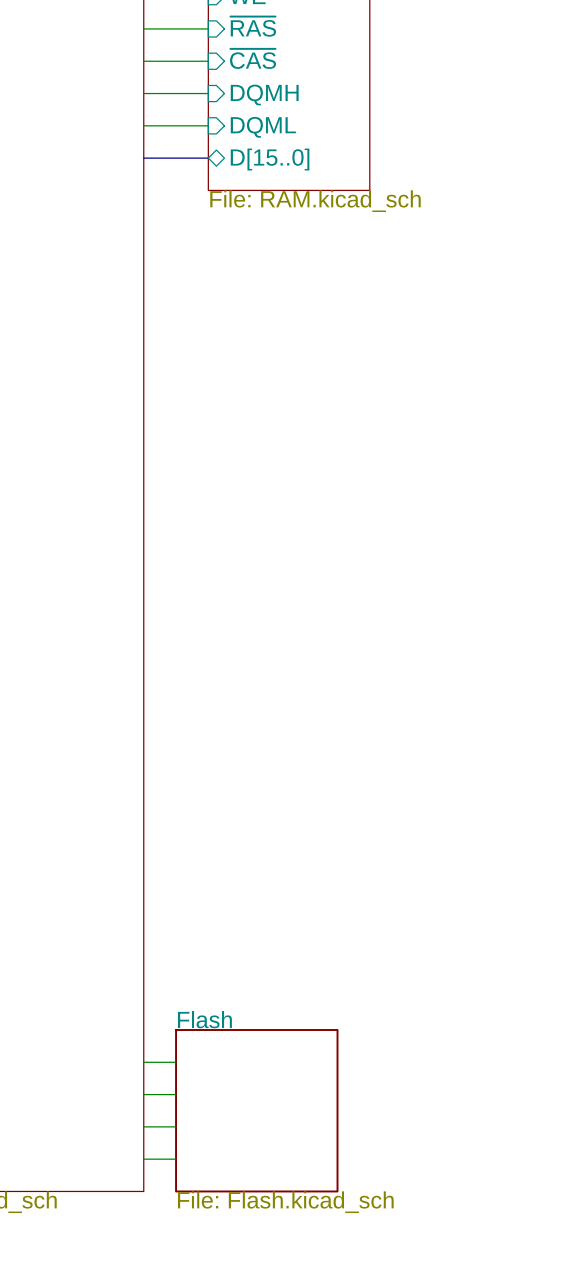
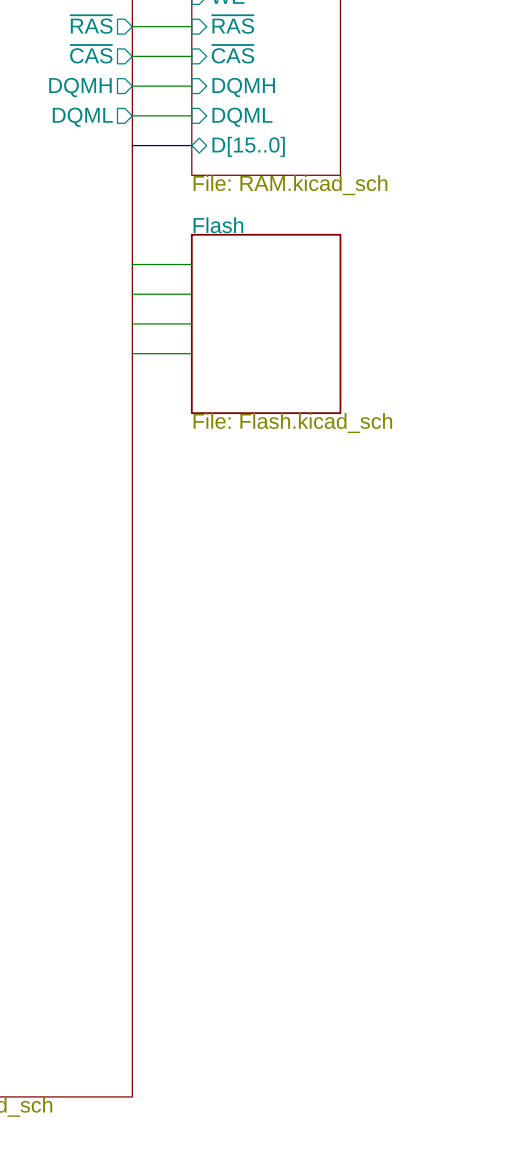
sheet pin: none -> ~{RAS} (91, 24)
sheet pin: none -> ~{CAS} (91, 54)
sheet pin: none -> DQMH (80, 87)
sheet pin: none -> DQML (82, 117)
wire: none -> (132, 264) (191, 264)
wire: none -> (132, 294) (191, 294)
wire: none -> (132, 323) (191, 323)
sheet Flash: none -> File: Flash.kicad_sch (266, 323)
wire: none -> (132, 353) (191, 353)
wire: (143, 1062) (176, 1062) -> none
wire: (143, 1094) (176, 1094) -> none
sheet Flash: File: Flash.kicad_sch (256, 1110) -> none
wire: (143, 1126) (176, 1126) -> none
wire: (143, 1159) (176, 1159) -> none

